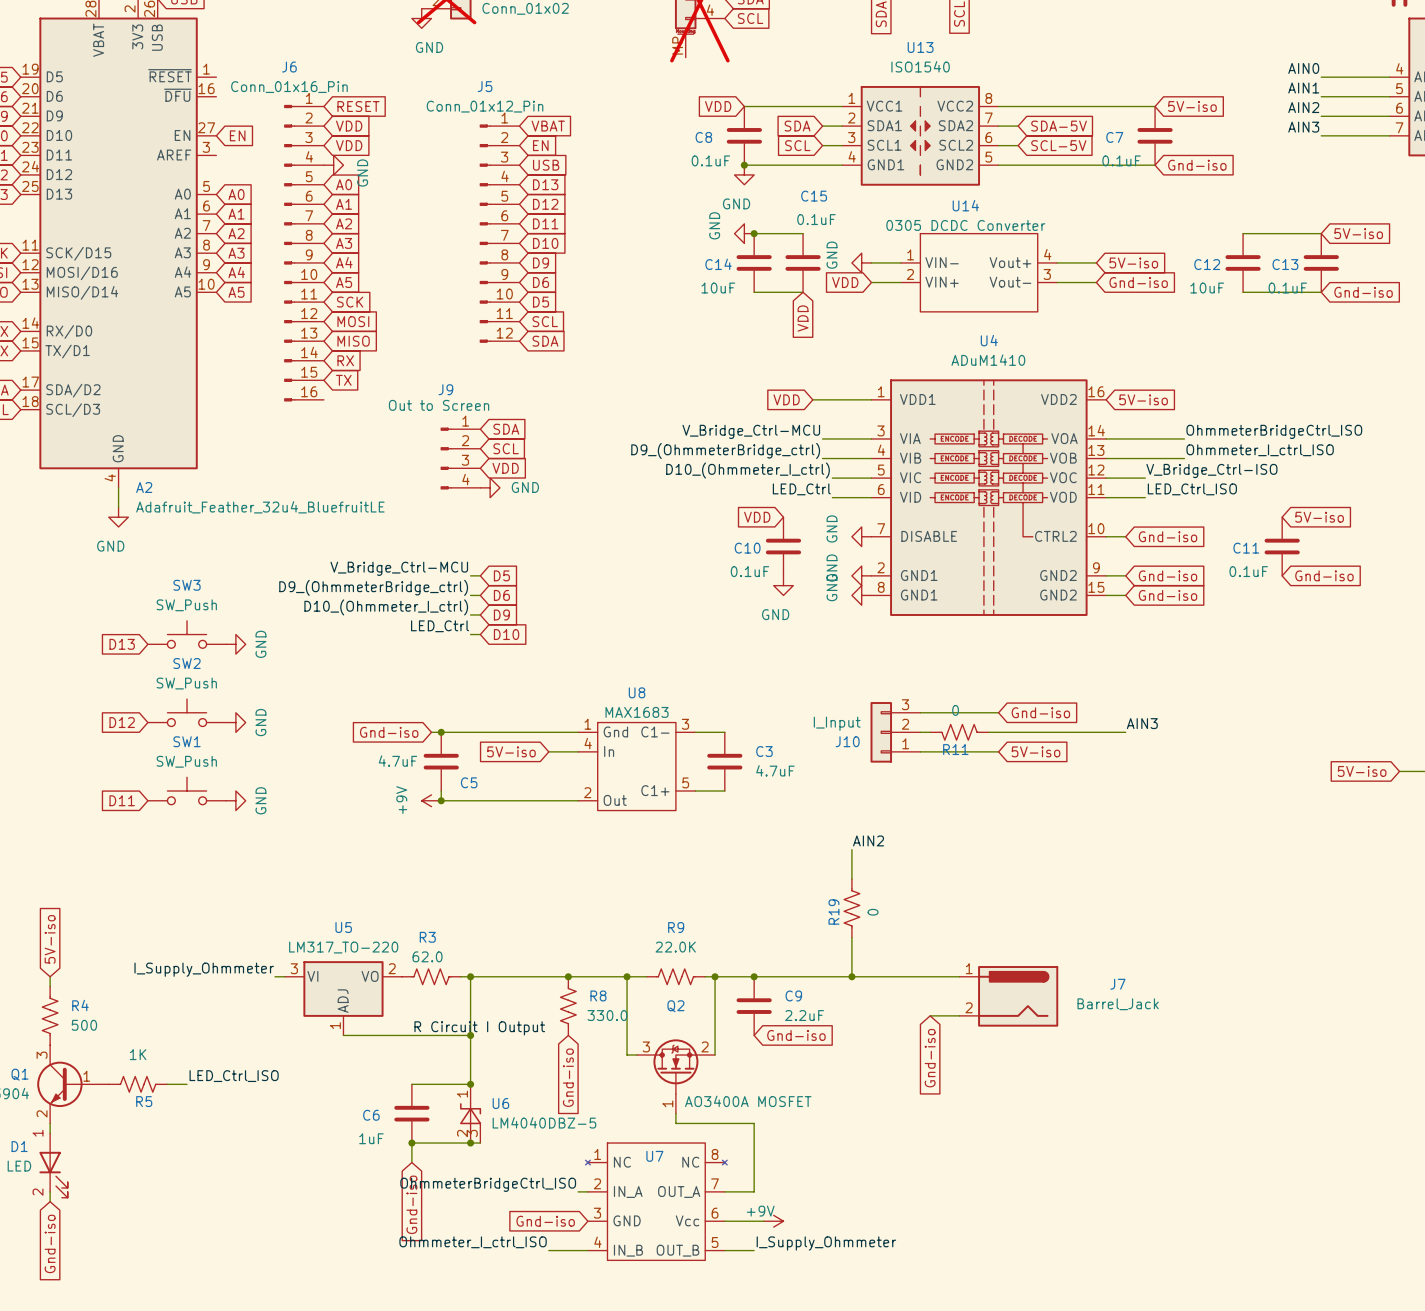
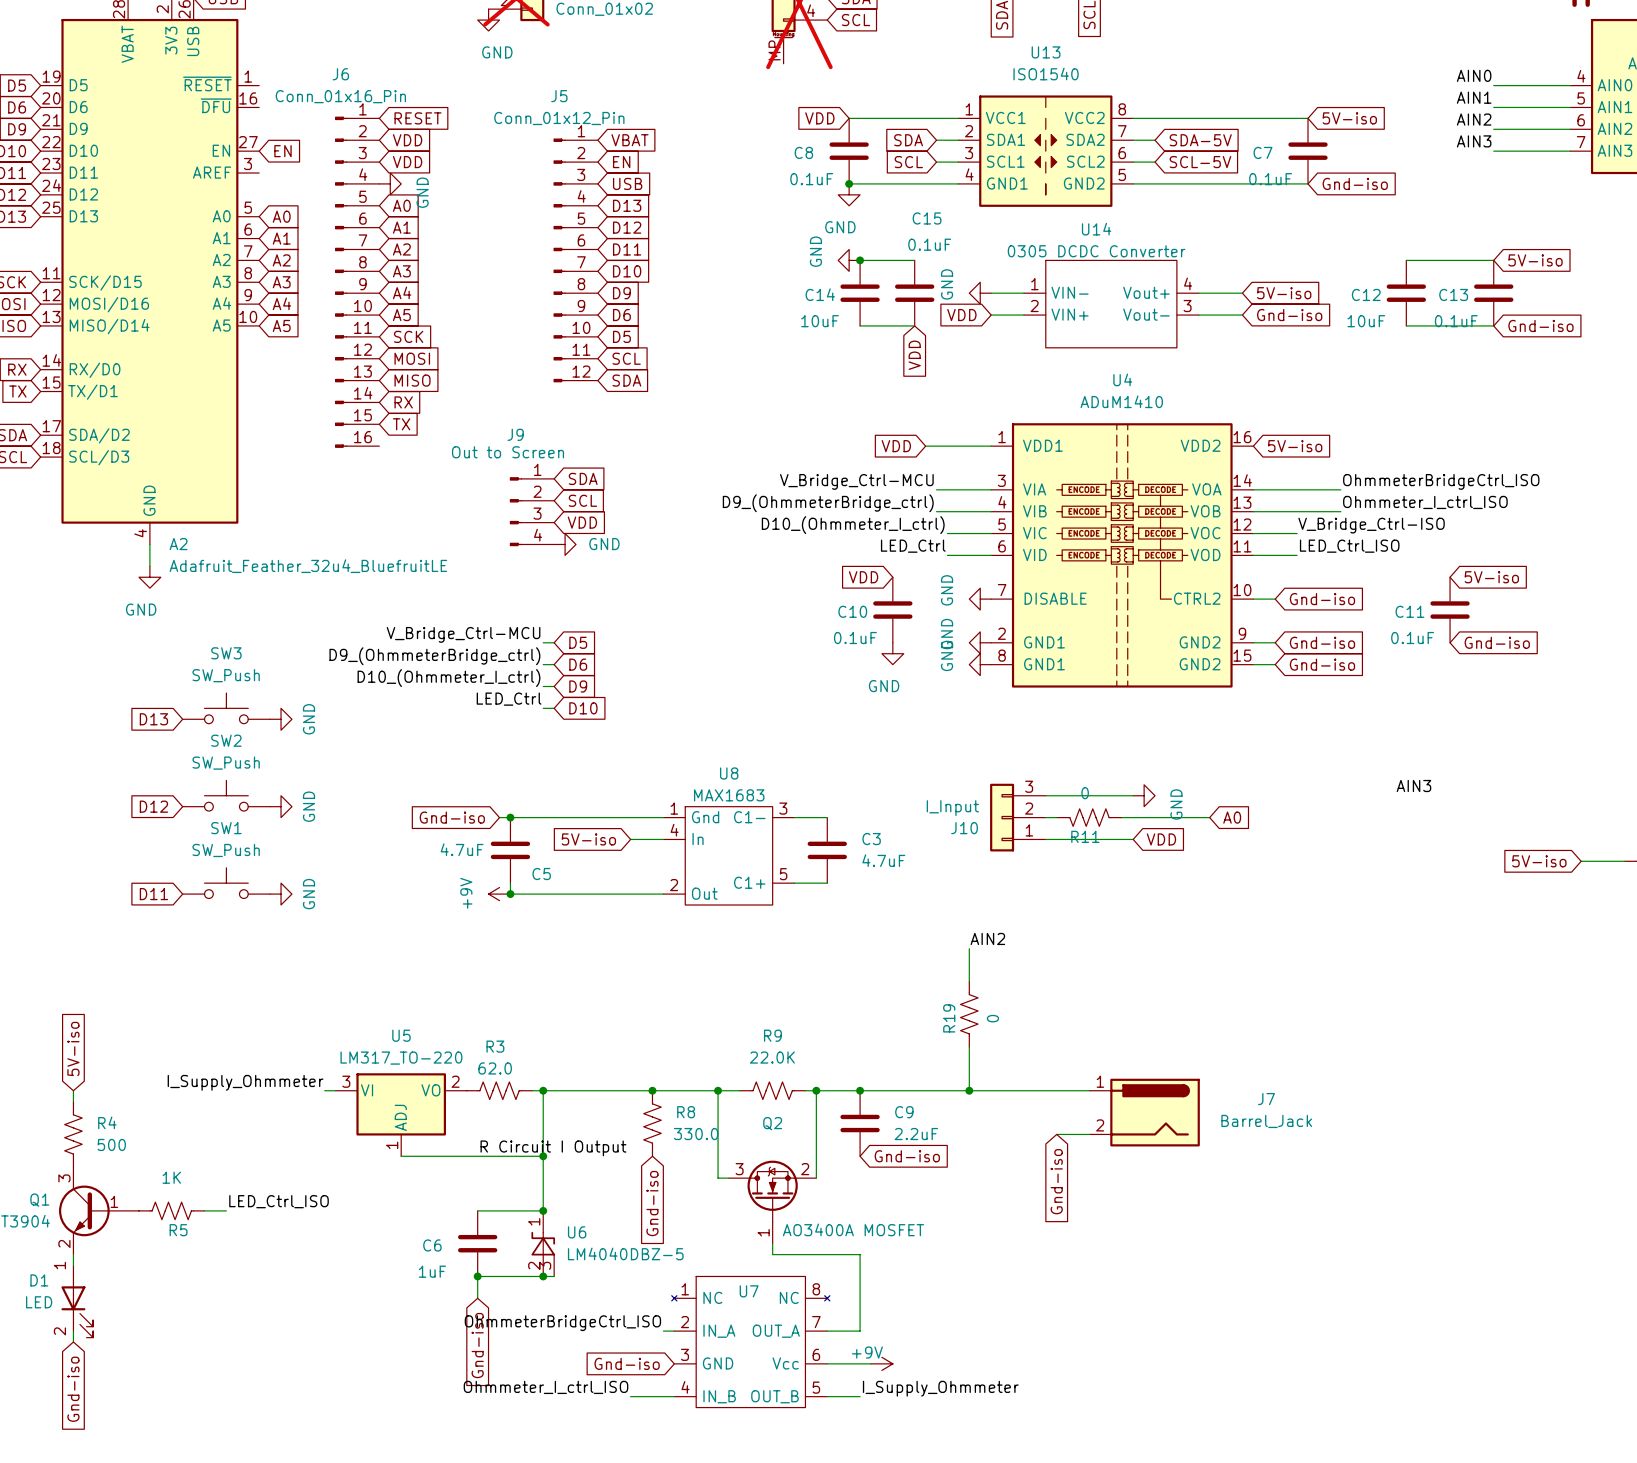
power symbol: none -> GND (1144, 795)
global label: Gnd-iso (1040, 712) -> none
label position: AIN3 (1142, 723) -> AIN3 (1413, 786)
wire: (1067, 732) (1125, 732) -> none
global label: none -> A0 (1232, 817)
global label: 5V-iso (1035, 751) -> VDD (1161, 839)

